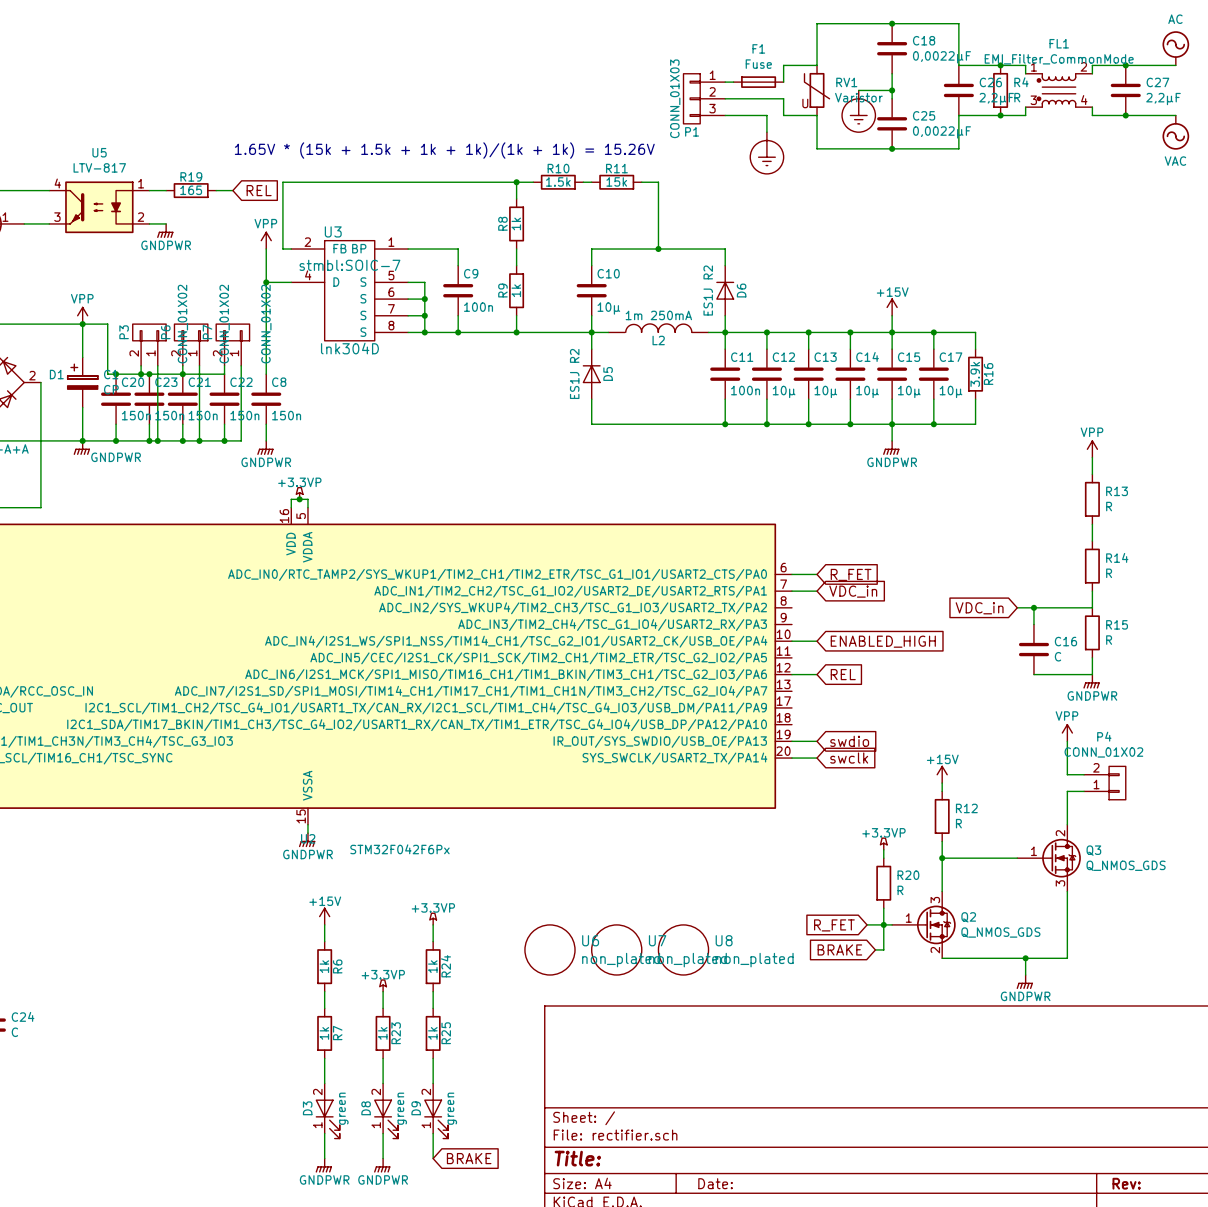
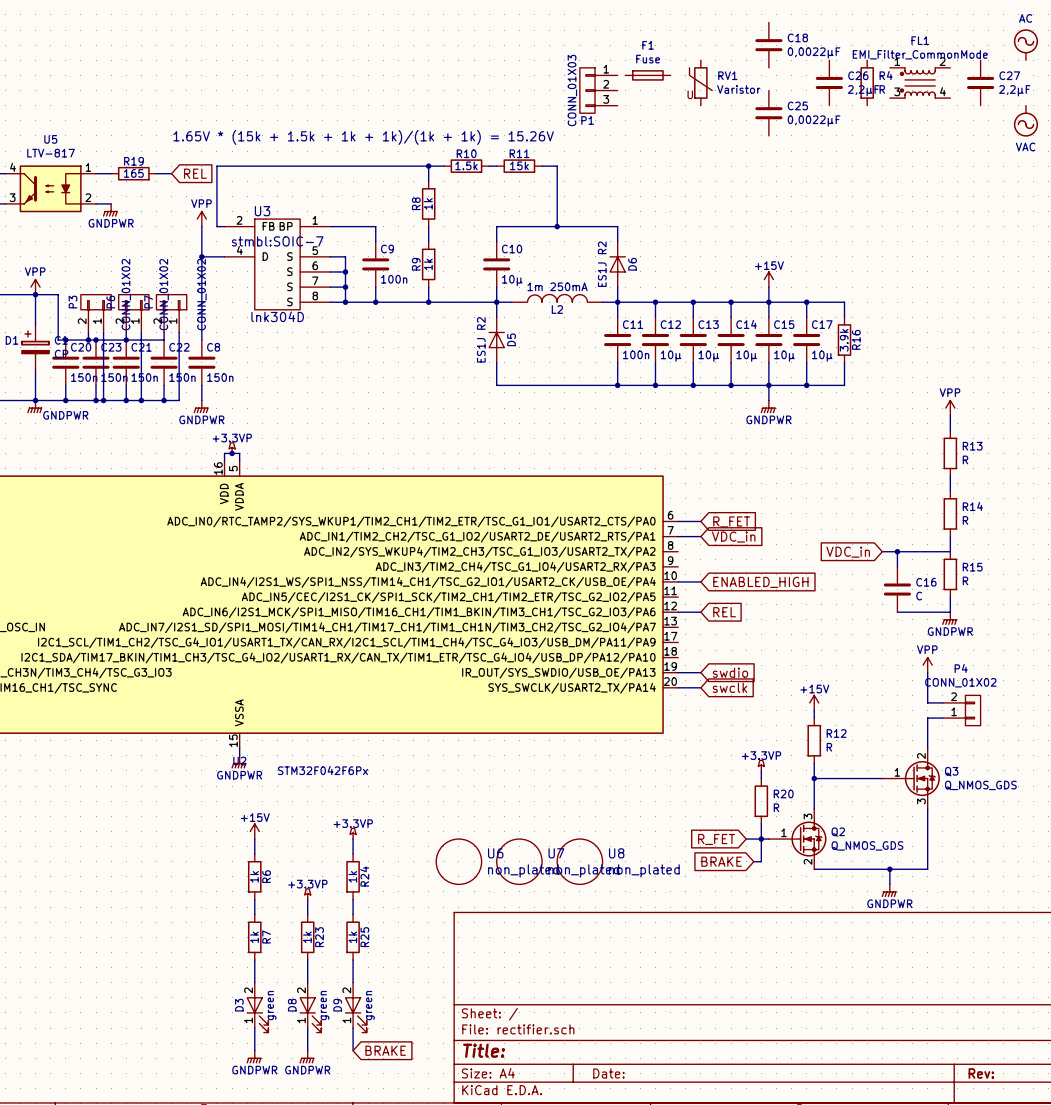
junction: (892, 23) -> none
junction: (1000, 65) -> none
junction: (1125, 65) -> none
wire: (1175, 65) (1092, 65) (1092, 73) -> none
wire: (892, 73) (892, 98) -> none
wire: (1025, 73) (1025, 65) (958, 65) (958, 23) (817, 23) (817, 65) (783, 65) (783, 82) -> none
wire: (725, 82) (733, 82) -> none
wire: (858, 90) (892, 90) -> none
junction: (892, 90) -> none
wire: (725, 98) (783, 98) (783, 115) (817, 115) (817, 148) (958, 148) (958, 115) (1025, 115) (1025, 107) -> none
wire: (1092, 107) (1092, 115) (1175, 115) -> none
power symbol: (858, 111) -> none
wire: (725, 115) (766, 115) (766, 132) -> none
junction: (1000, 115) -> none
junction: (1125, 115) -> none
junction: (892, 148) -> none
power symbol: (766, 153) -> none

